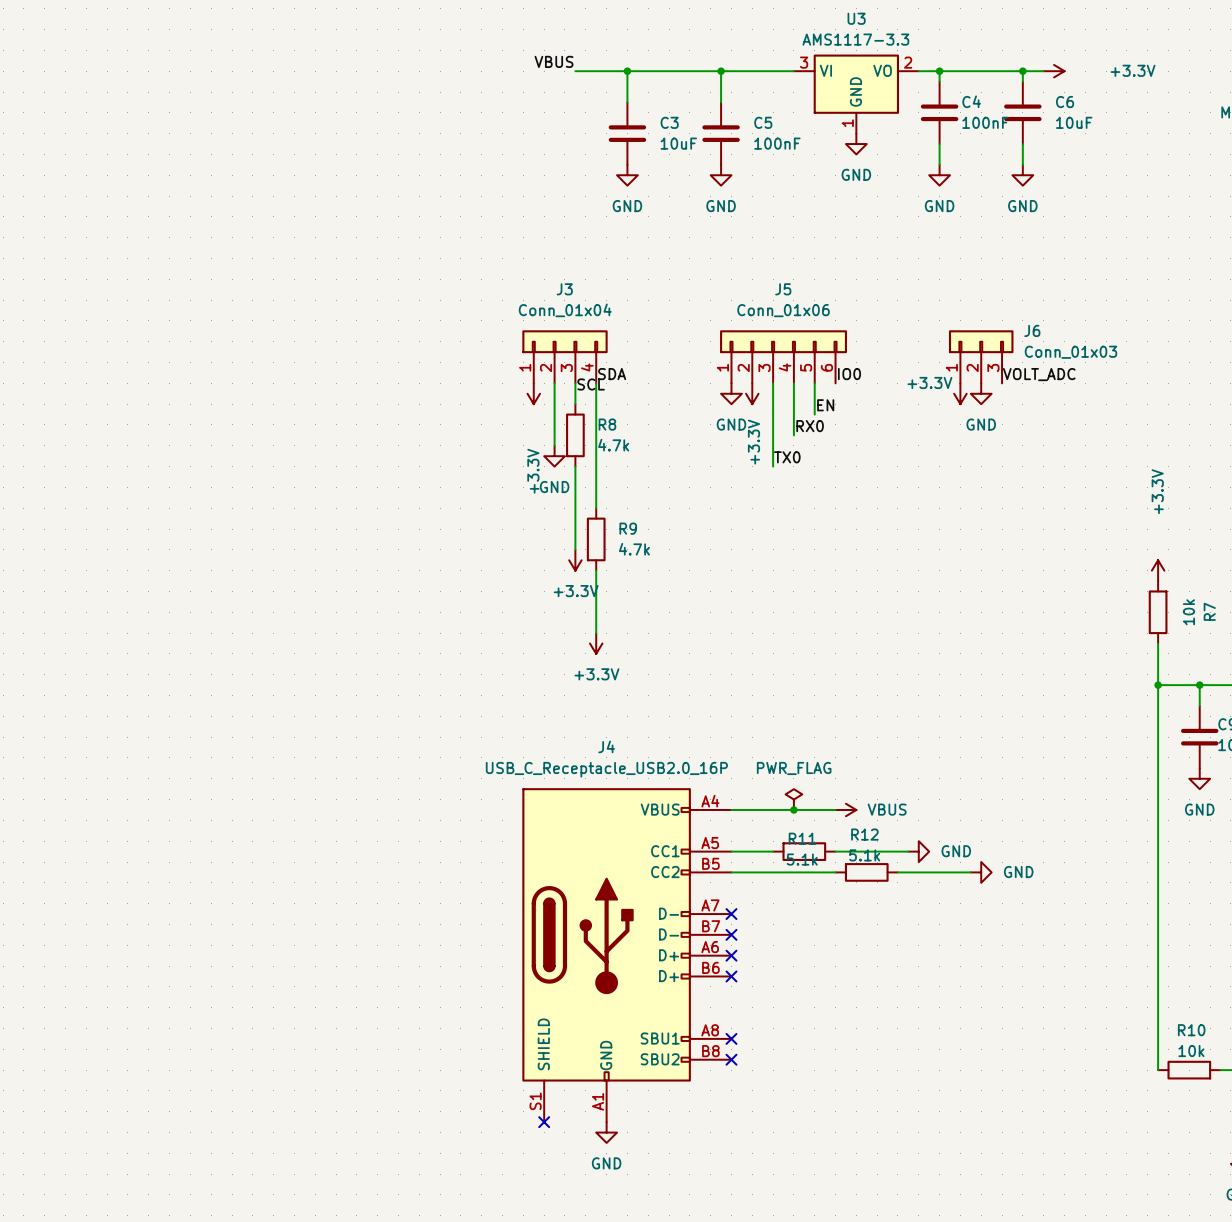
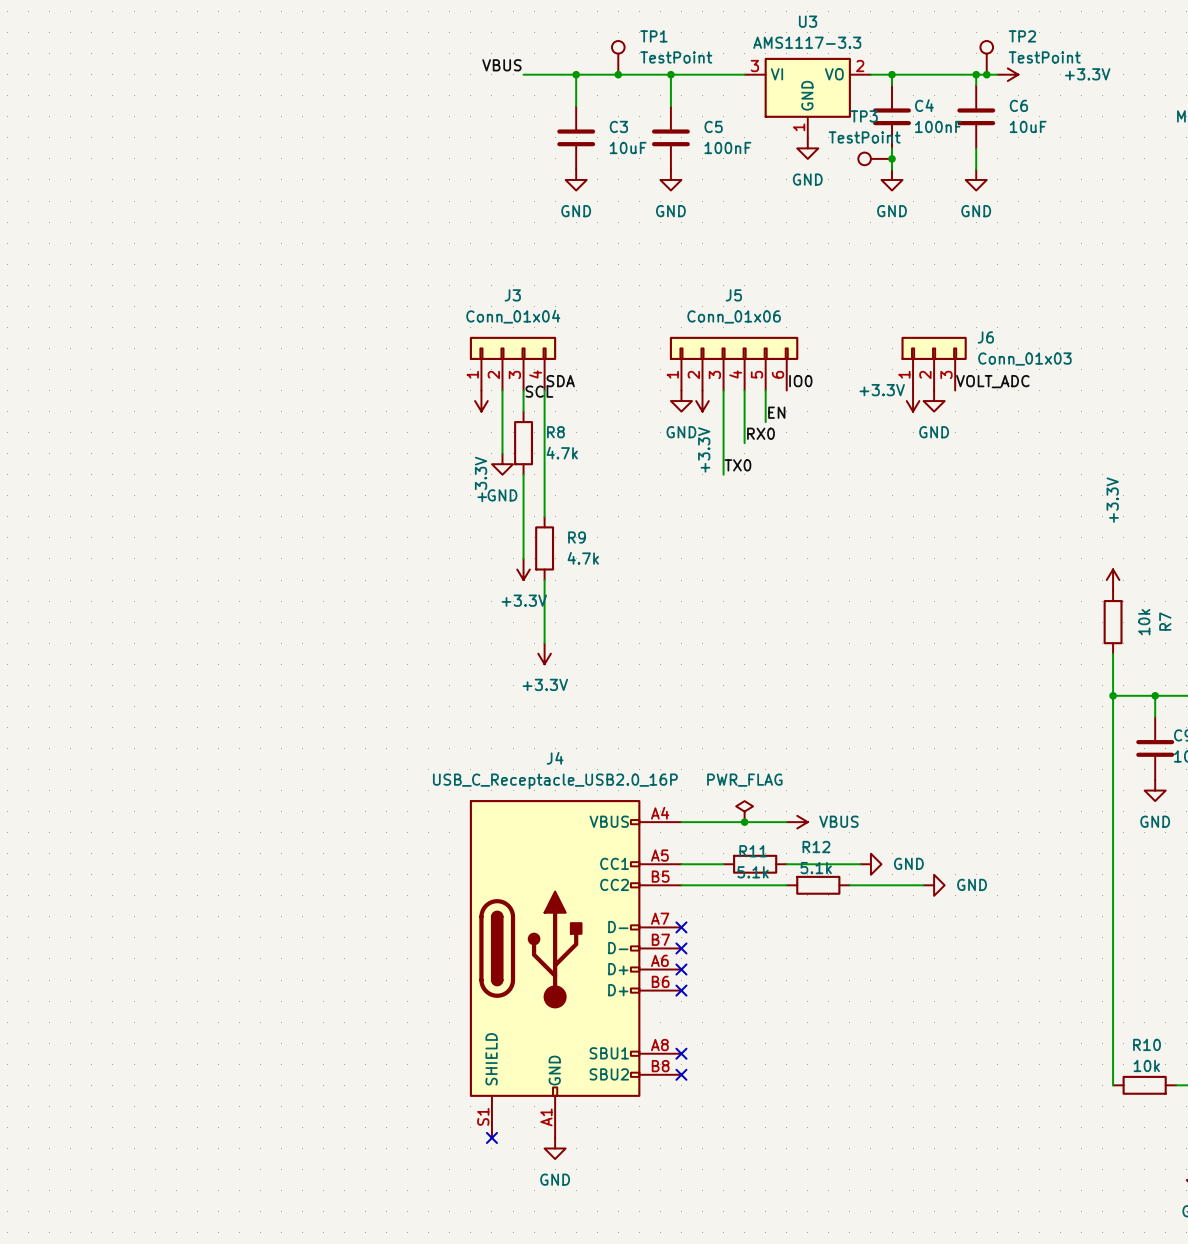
TP1: none -> TestPoint (618, 57)
TP2: none -> TestPoint (986, 57)
junction: none -> (618, 74)
junction: none -> (986, 74)
TP3: none -> TestPoint (875, 158)
junction: none -> (892, 158)

